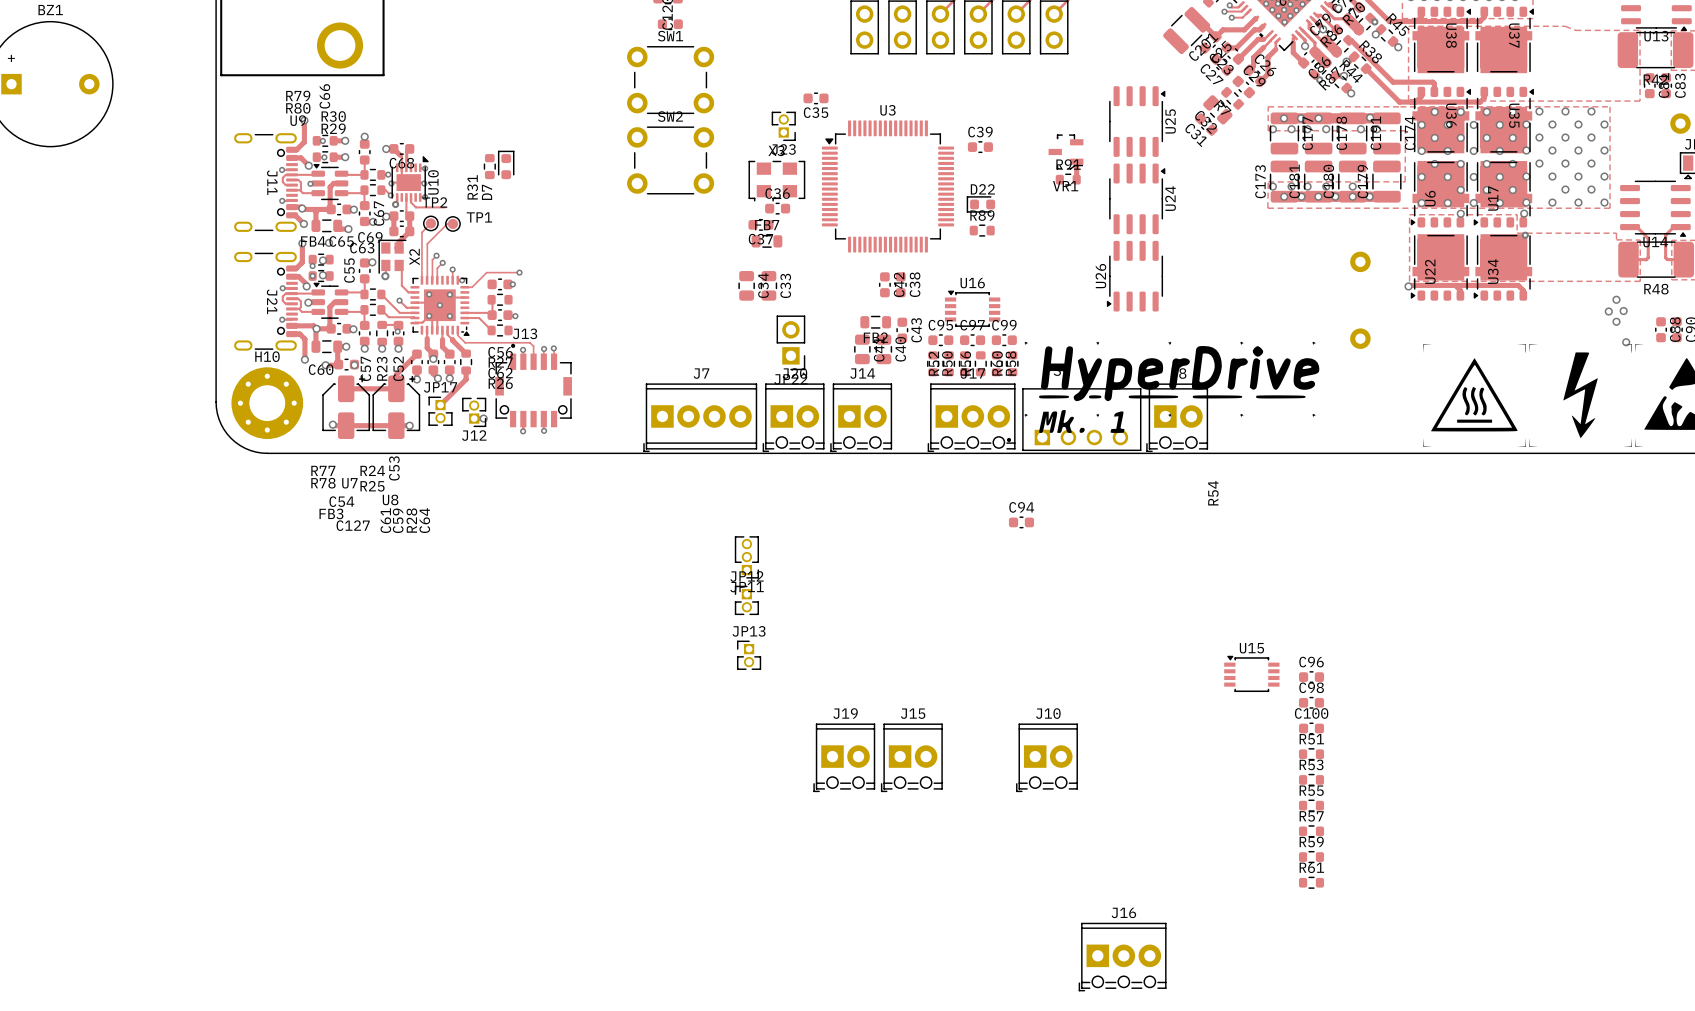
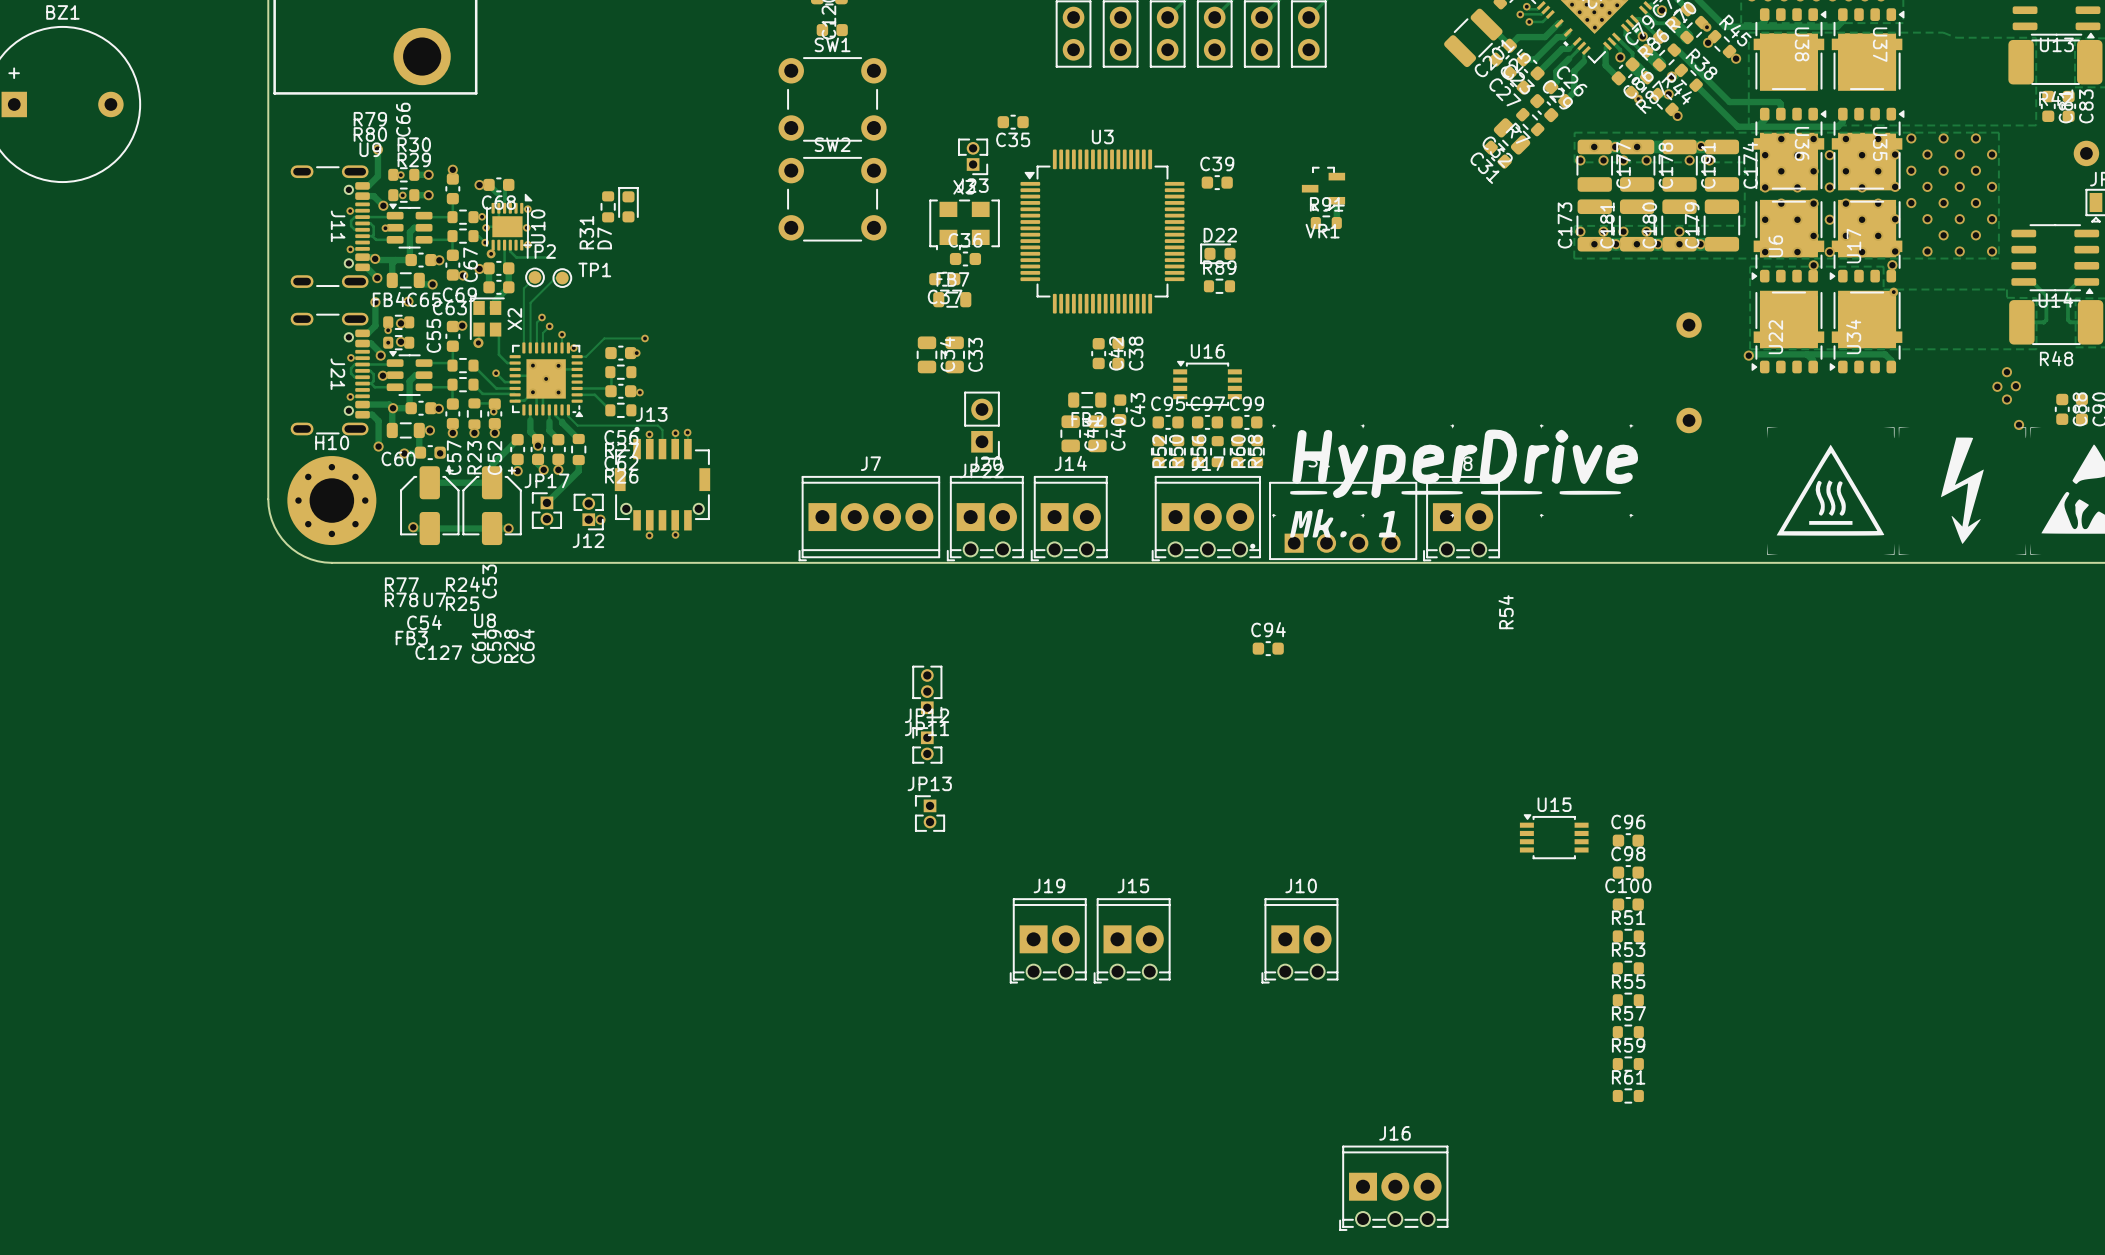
U25: (1137, 121) -> none
U24: (1137, 198) -> none
U26: (1134, 276) -> none

